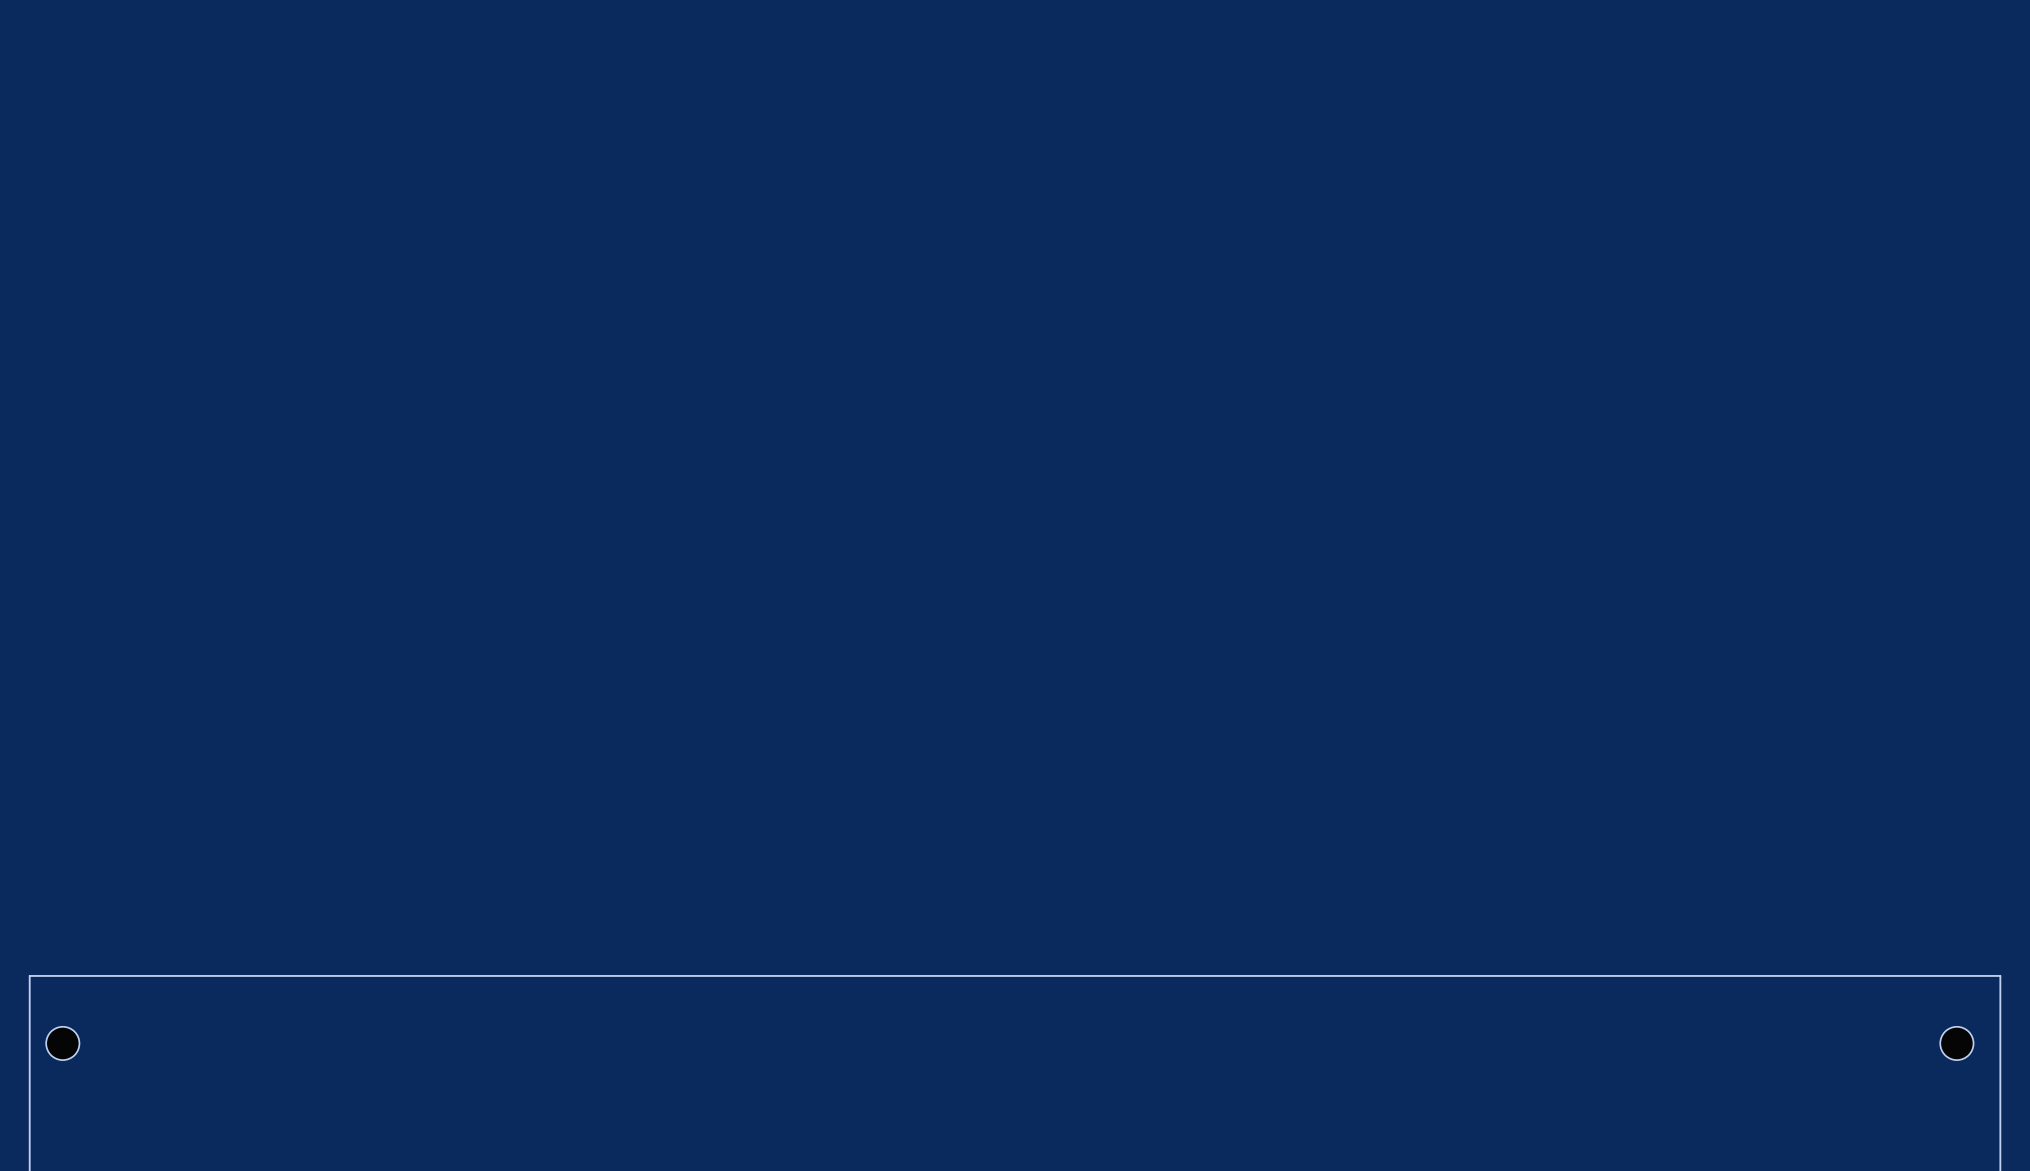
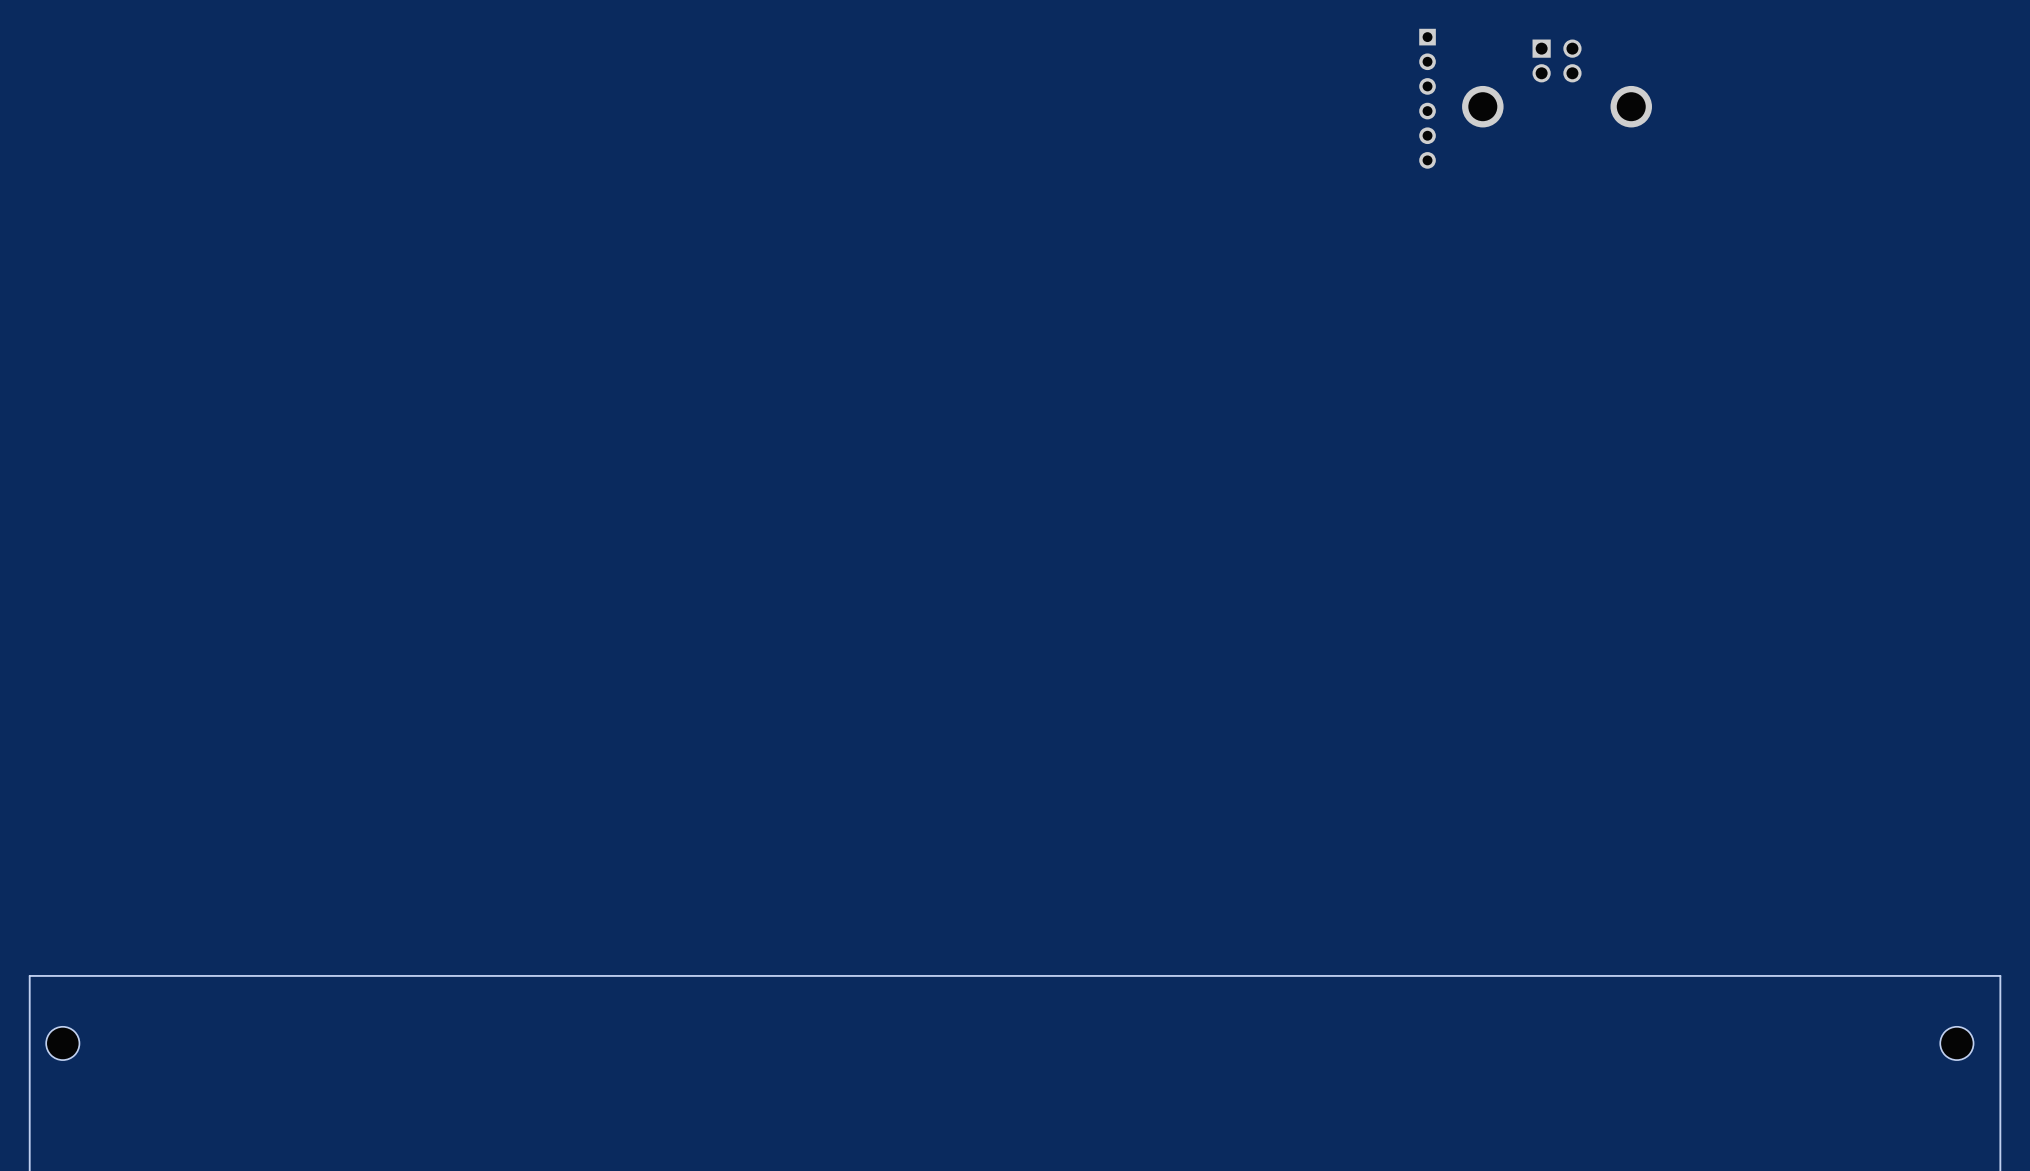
part: none -> (1557, 83)
part: none -> (1427, 98)

